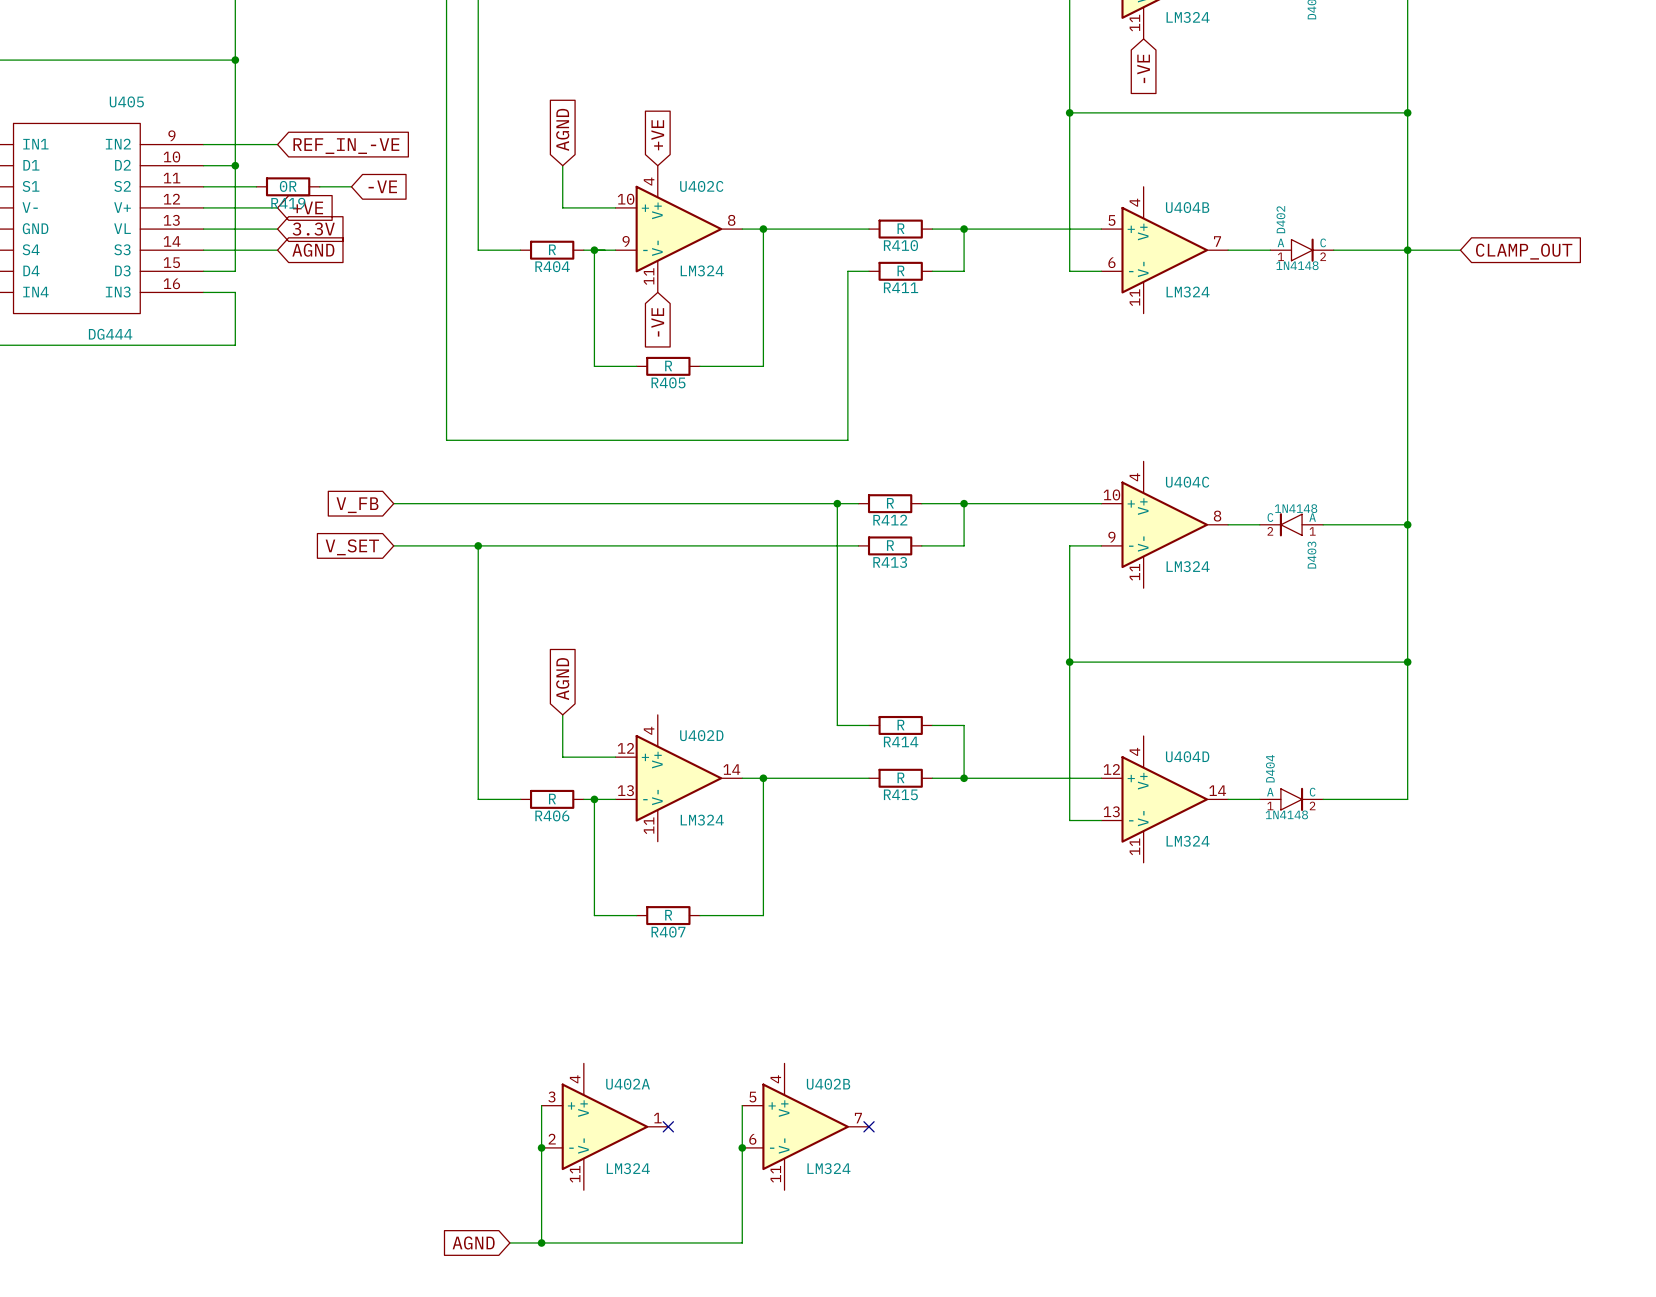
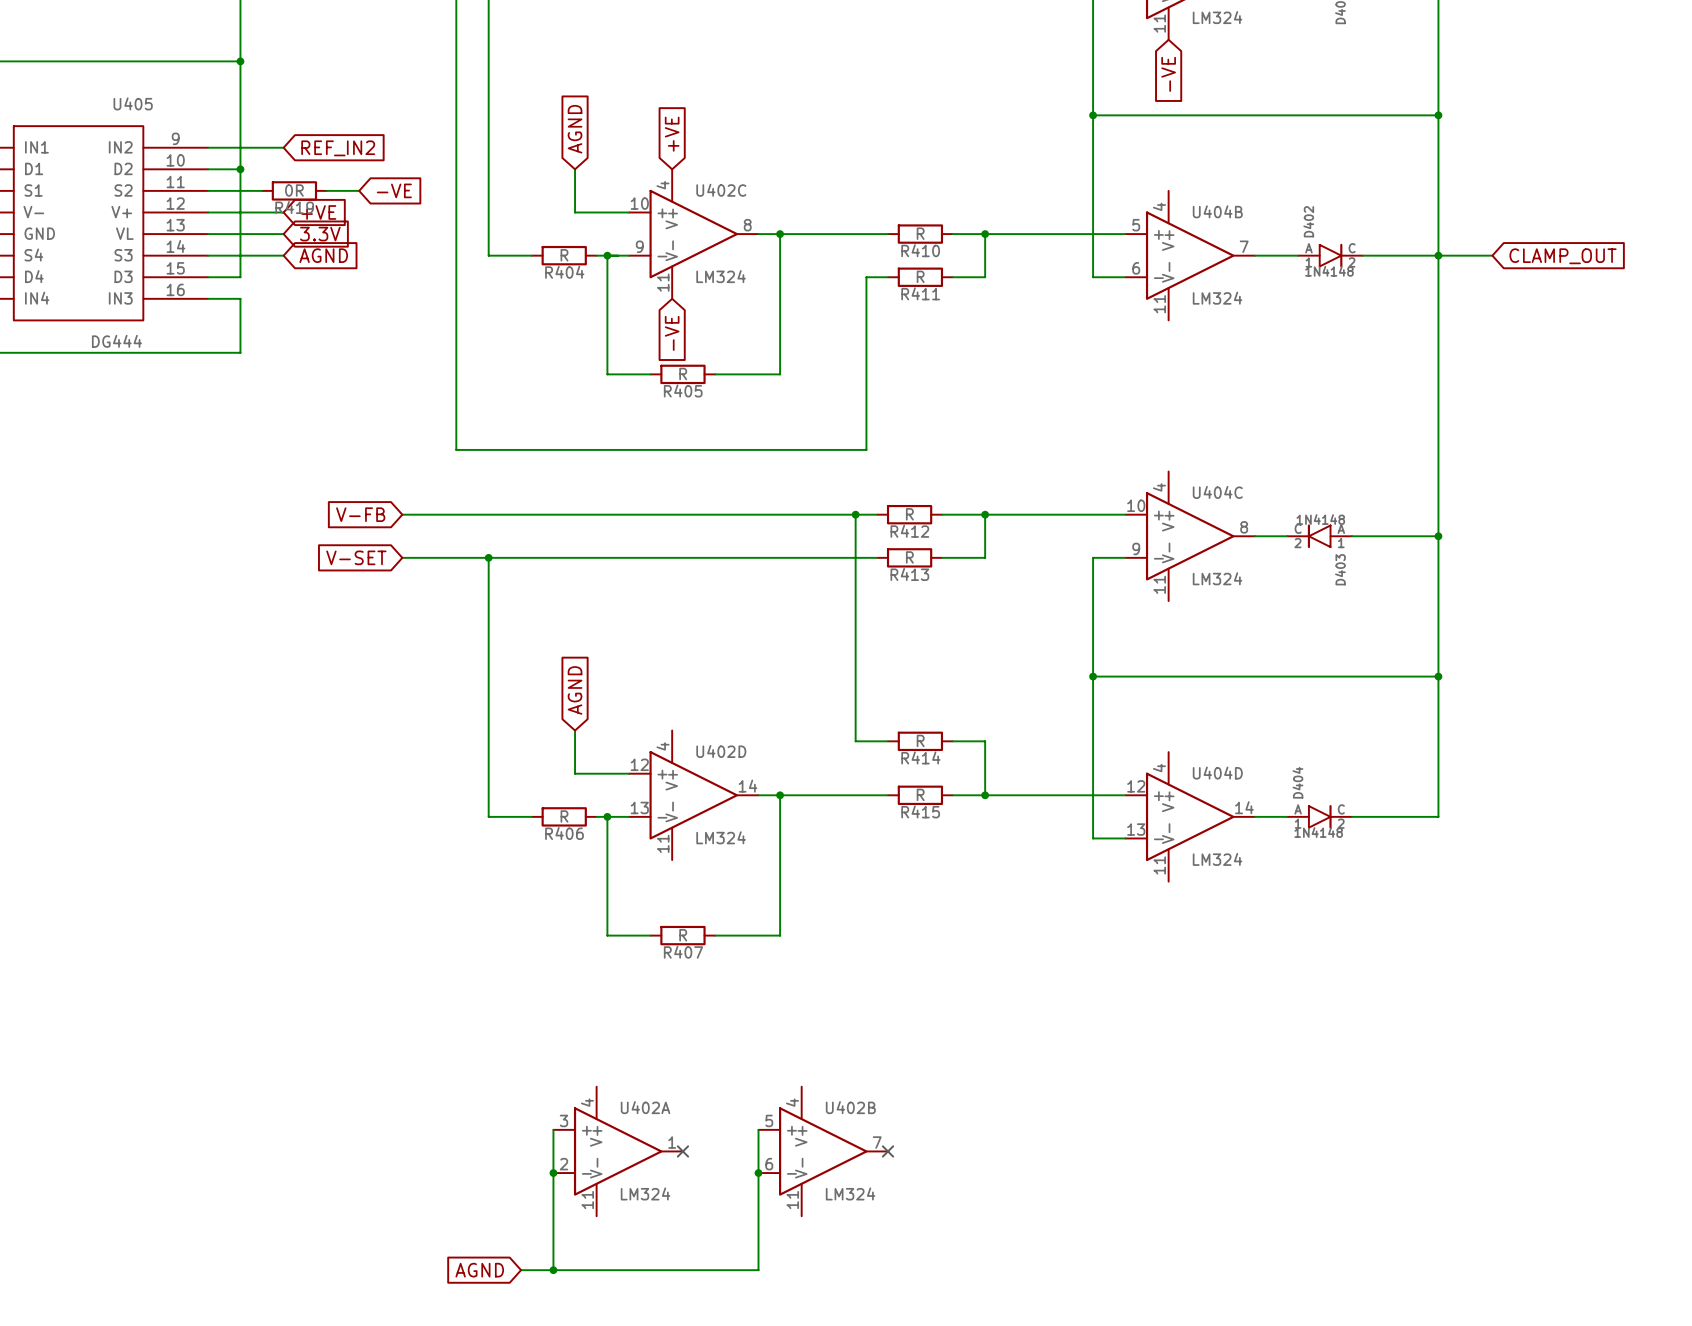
global label: REF_IN_-VE (346, 146) -> REF_IN2 (338, 148)
global label: V_FB (357, 505) -> V-FB (360, 514)
global label: V_SET (352, 547) -> V-SET (356, 557)

